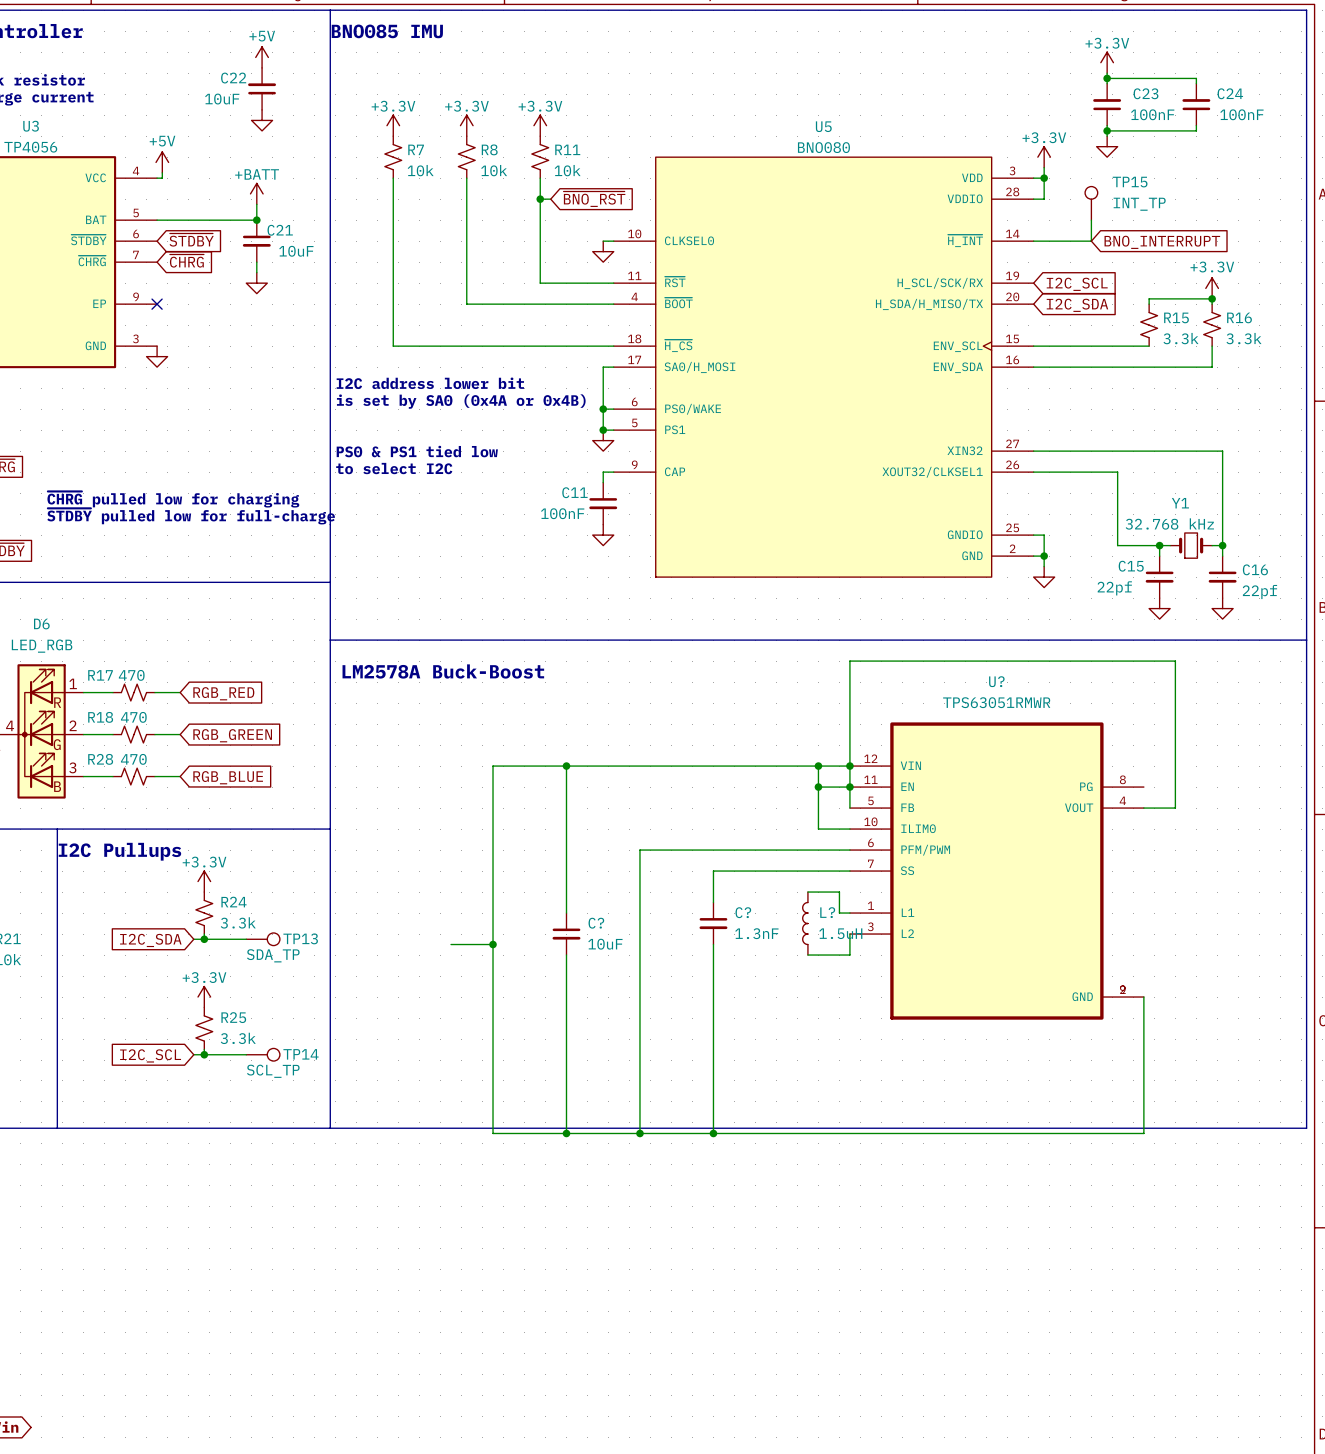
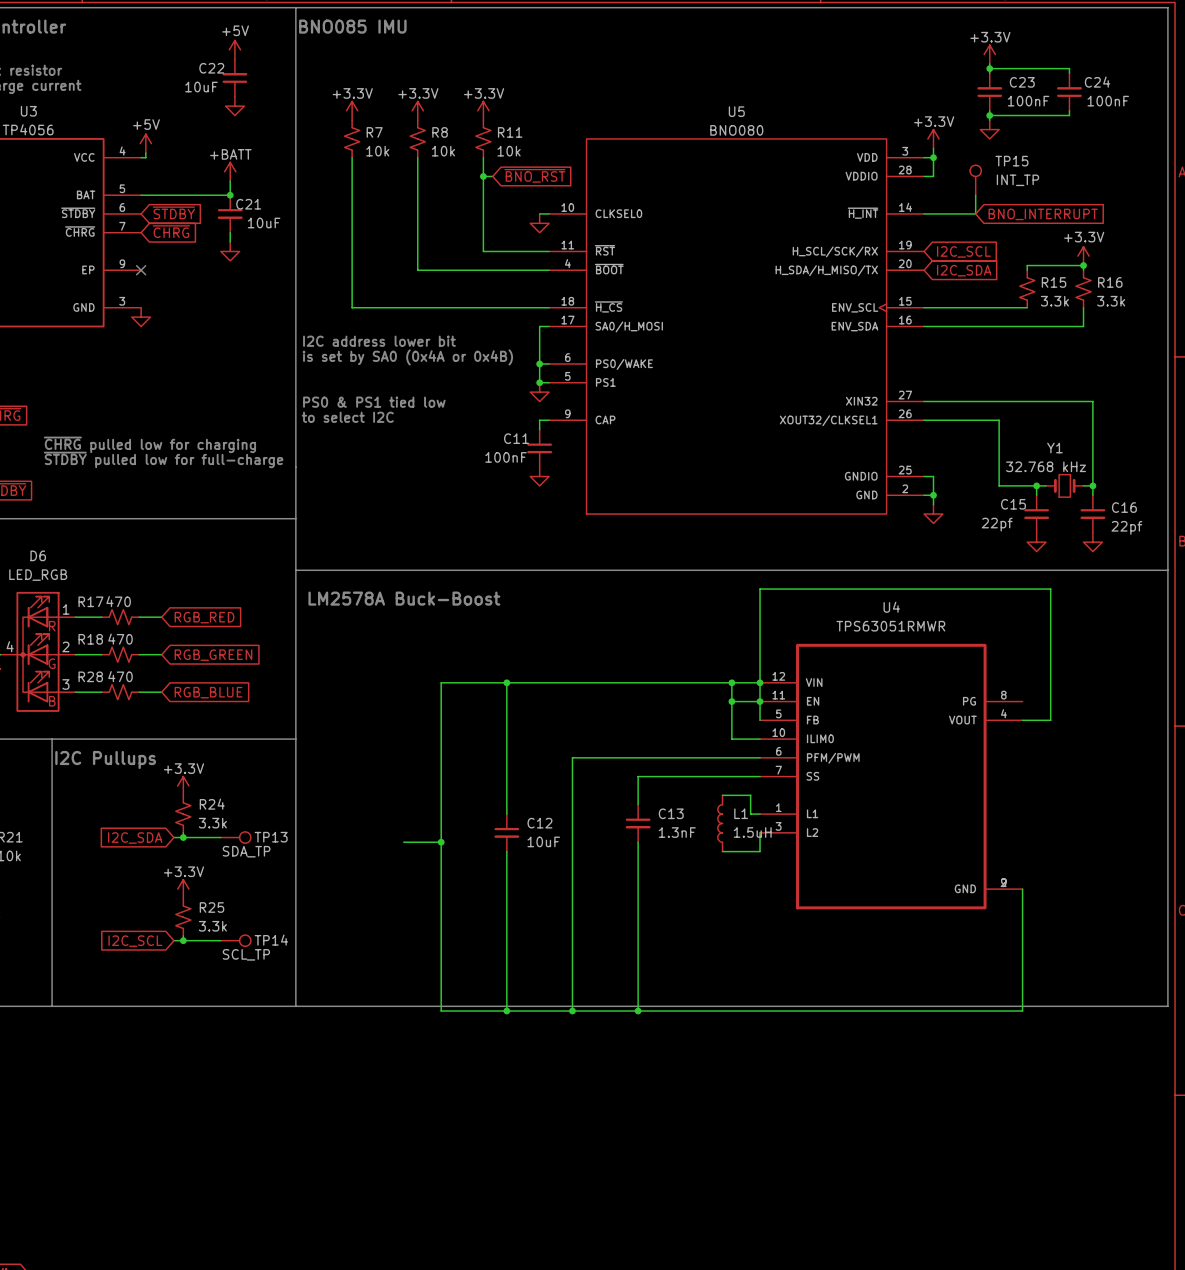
U? name: U? (996, 681) -> U4 (891, 607)
C? name: C? (743, 912) -> C13 (671, 813)
L? name: L? (827, 912) -> L1 (741, 813)
C? name: C? (596, 923) -> C12 (539, 823)

